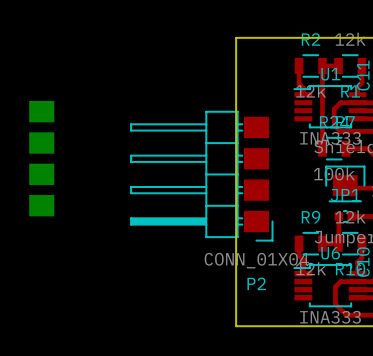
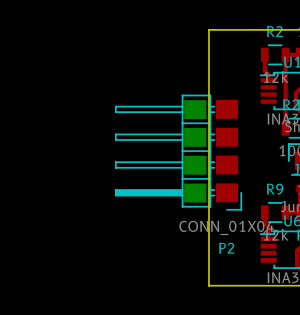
part position: (41, 158) -> (195, 151)

